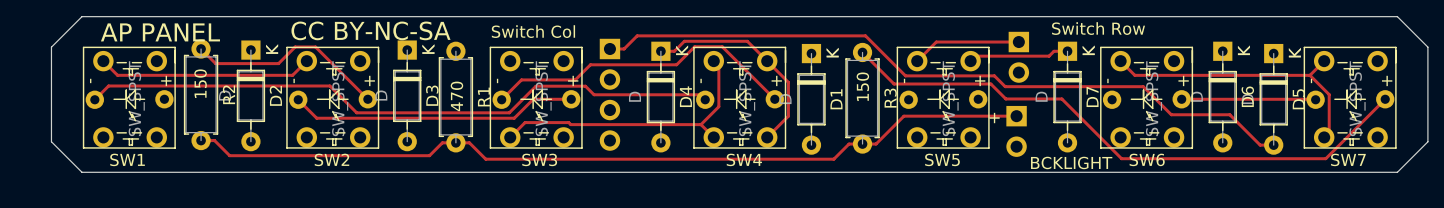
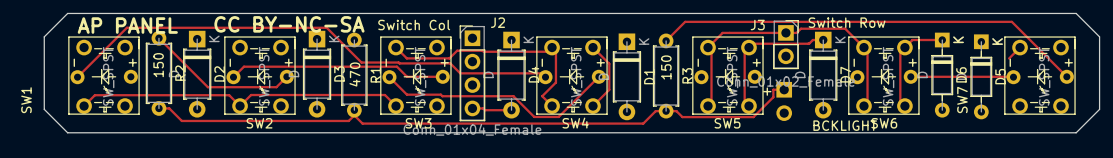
D2 footprint: [236, 40, 266, 152] -> [183, 30, 212, 118]
D3 footprint: [393, 40, 422, 152] -> [302, 30, 332, 118]
D4 footprint: [646, 41, 676, 153] -> [497, 31, 526, 119]
D7 footprint: [1053, 41, 1082, 153] -> [809, 31, 838, 119]
track: none -> (785, 32) (796, 32) (800, 28) (845, 28) (863, 47)
D1 footprint: [797, 43, 826, 155] -> [612, 33, 642, 121]
track: (609, 48) (624, 48) (637, 35) (865, 35) (905, 75) (994, 75) (1005, 86) (1143, 86) (1171, 114) (1229, 114) (1260, 145) (1273, 145) -> none
track: (660, 51) (674, 51) (684, 41) (747, 41) (767, 61) -> none
track: none -> (942, 40) (912, 40) (900, 52) (900, 101) (904, 106)
track: (862, 52) (894, 83) (990, 83) (1005, 98) (1061, 98) (1121, 158) (1325, 158) (1385, 99) -> (666, 40) (685, 21) (1011, 21) (1066, 76)
J3 side: bottom (1018, 57) -> top (785, 44)
track: (103, 61) (117, 75) (292, 75) (306, 61) -> none
track: none -> (748, 47) (744, 51) (744, 101) (748, 106)
track: (215, 63) (278, 63) (295, 46) (315, 46) (367, 99) -> (170, 49) (207, 87) (276, 87) (286, 76)
track: (589, 65) (676, 64) (694, 46) (722, 46) (774, 99) -> (457, 50) (547, 51)
track: none -> (711, 51) (711, 102) (708, 106)
track: (1125, 65) (1134, 75) (1309, 75) (1329, 94) (1329, 132) (1324, 137) -> (867, 51) (867, 102) (863, 106)
track: (579, 75) (575, 79) (521, 79) (501, 99) -> (449, 58) (406, 58) (396, 47)
track: (108, 85) (329, 85) (356, 112) (509, 112) (535, 86) (585, 86) -> (88, 66) (126, 27) (326, 27) (361, 62) (450, 63) (453, 66)
J2 side: bottom (609, 94) -> top (472, 73)
track: (533, 99) (514, 118) (316, 118) (298, 99) -> (413, 76) (407, 76) (396, 66) (243, 66) (233, 77)
track: (1002, 116) (903, 116) (876, 144) -> (773, 89) (773, 97) (753, 117) (682, 117) (676, 111)
track: (568, 122) (525, 122) (510, 137) -> (440, 94) (406, 94) (389, 77)
track: (663, 124) (700, 124) -> (513, 96) (534, 116) (558, 116) (598, 76)
track: none -> (84, 106) (94, 95) (229, 95) (240, 106) (251, 95) (384, 95) (396, 106)
track: none -> (472, 108) (511, 110)
track: none -> (354, 115) (348, 120) (180, 120)
track: (229, 155) (429, 155) (442, 142) (469, 142) (485, 159) (833, 159) -> (354, 115) (362, 123) (644, 122)
SW1 name rotation: 0° (127, 159) -> 90° counterclockwise (26, 100)
SW1 name position: SW1 (127, 159) -> SW1 (26, 100)
SW7 name rotation: 0° (1348, 159) -> 90° counterclockwise (962, 99)
SW7 name position: SW7 (1348, 159) -> SW7 (962, 99)
text position: BCKLIGHT (1071, 162) -> BCKLIGHT (845, 125)

